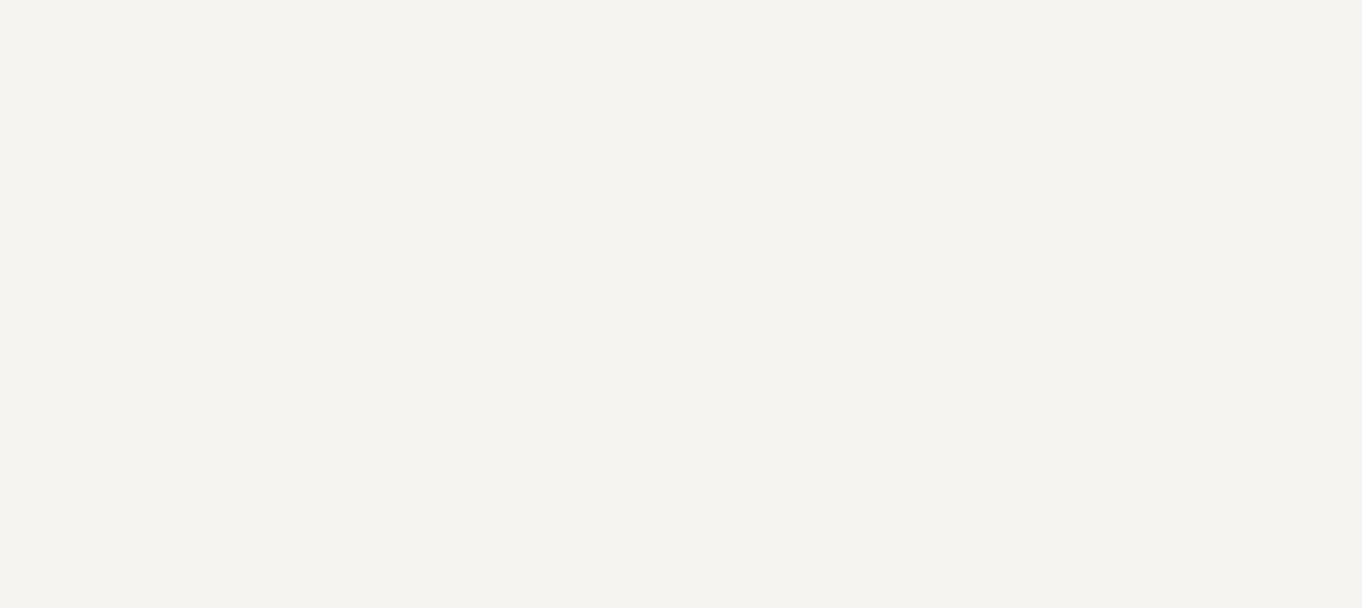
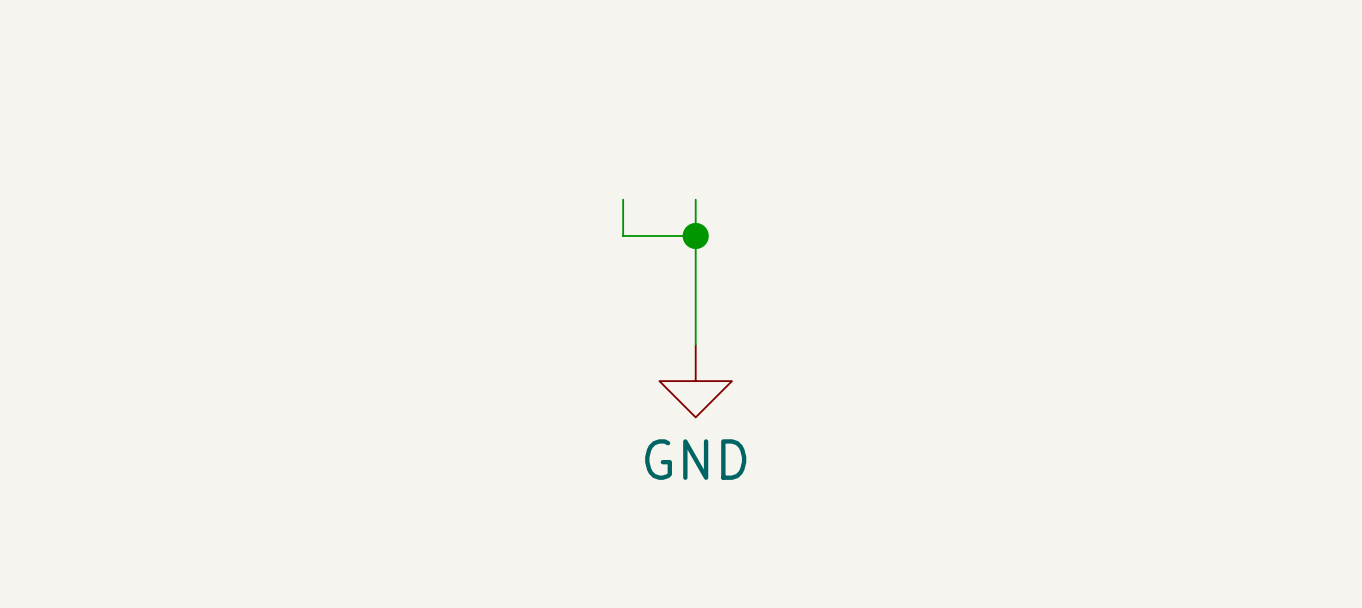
wire: none -> (623, 199) (623, 235) (695, 235)
wire: none -> (695, 199) (695, 344)
junction: none -> (695, 235)
power symbol: none -> GND (695, 381)

